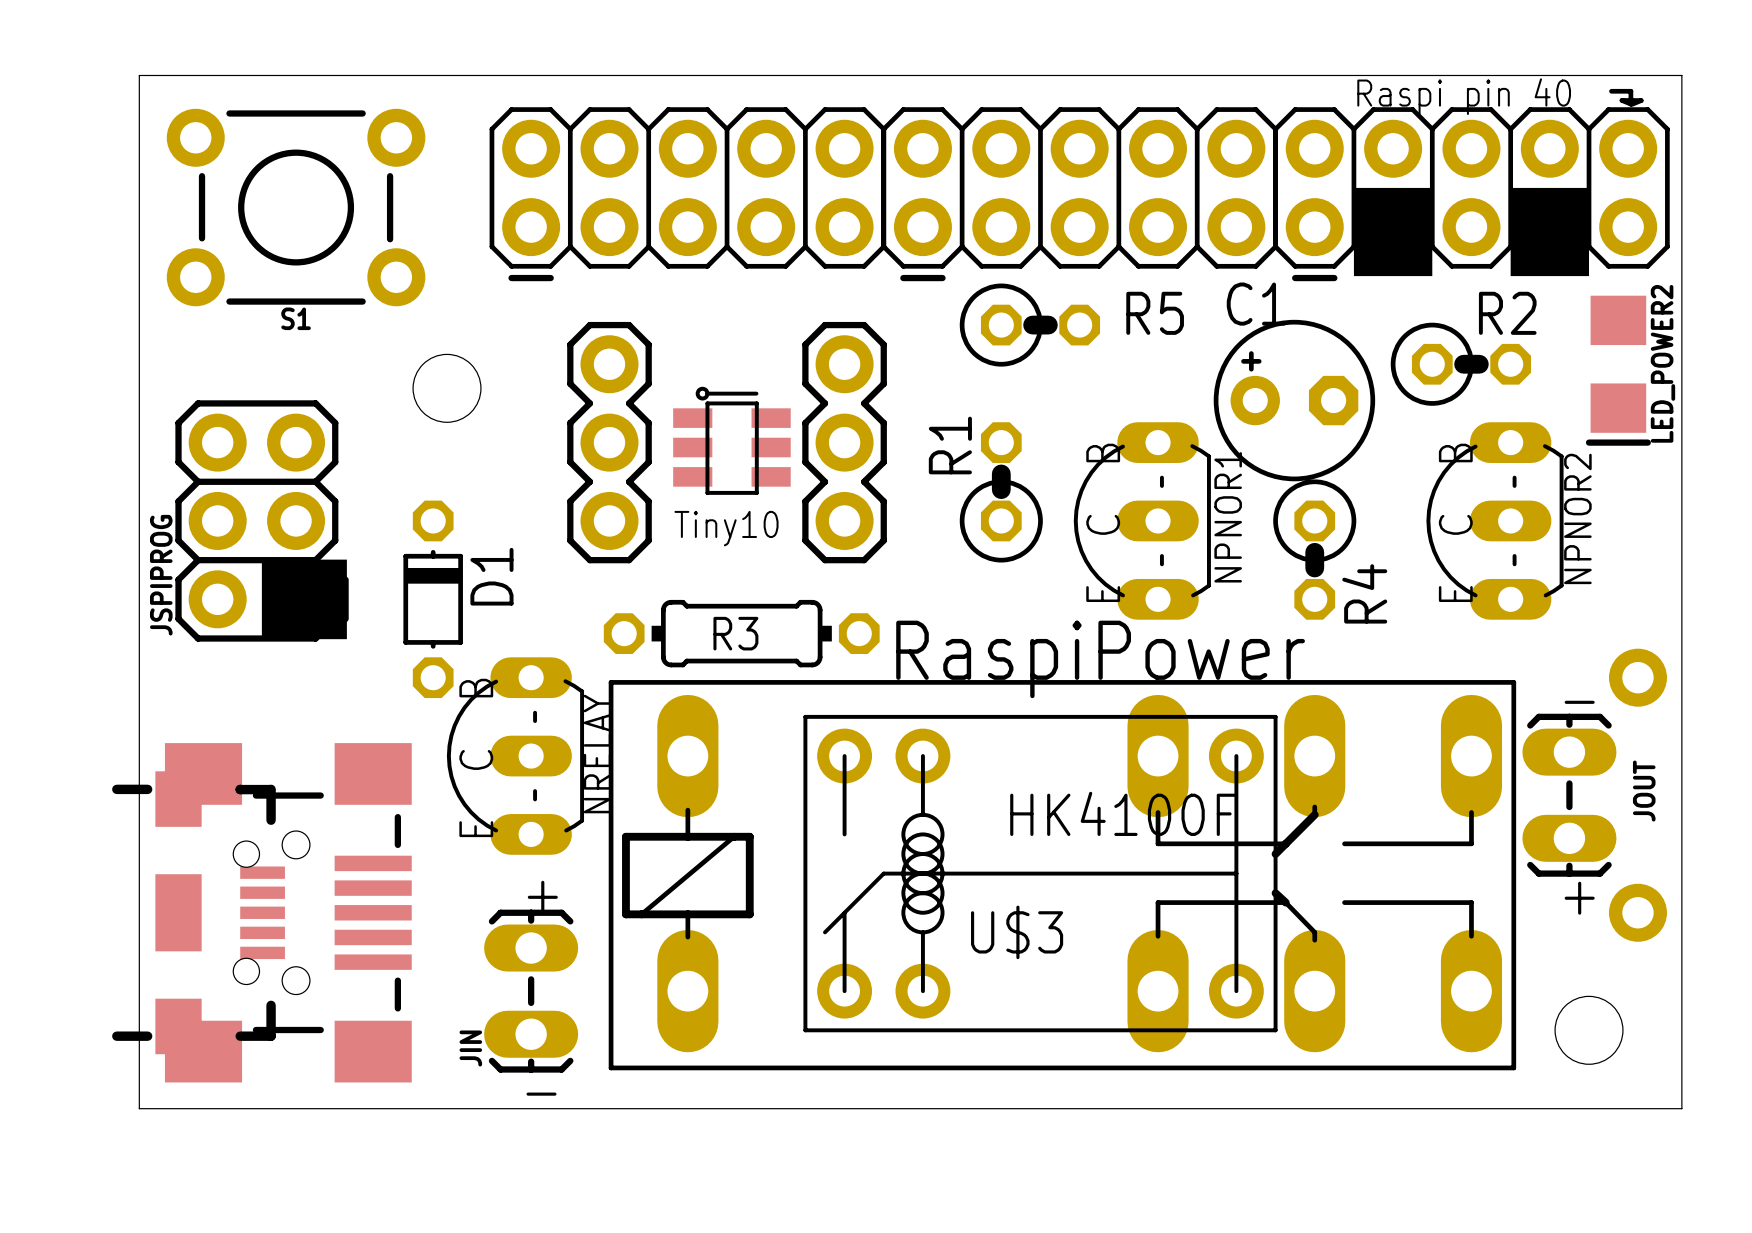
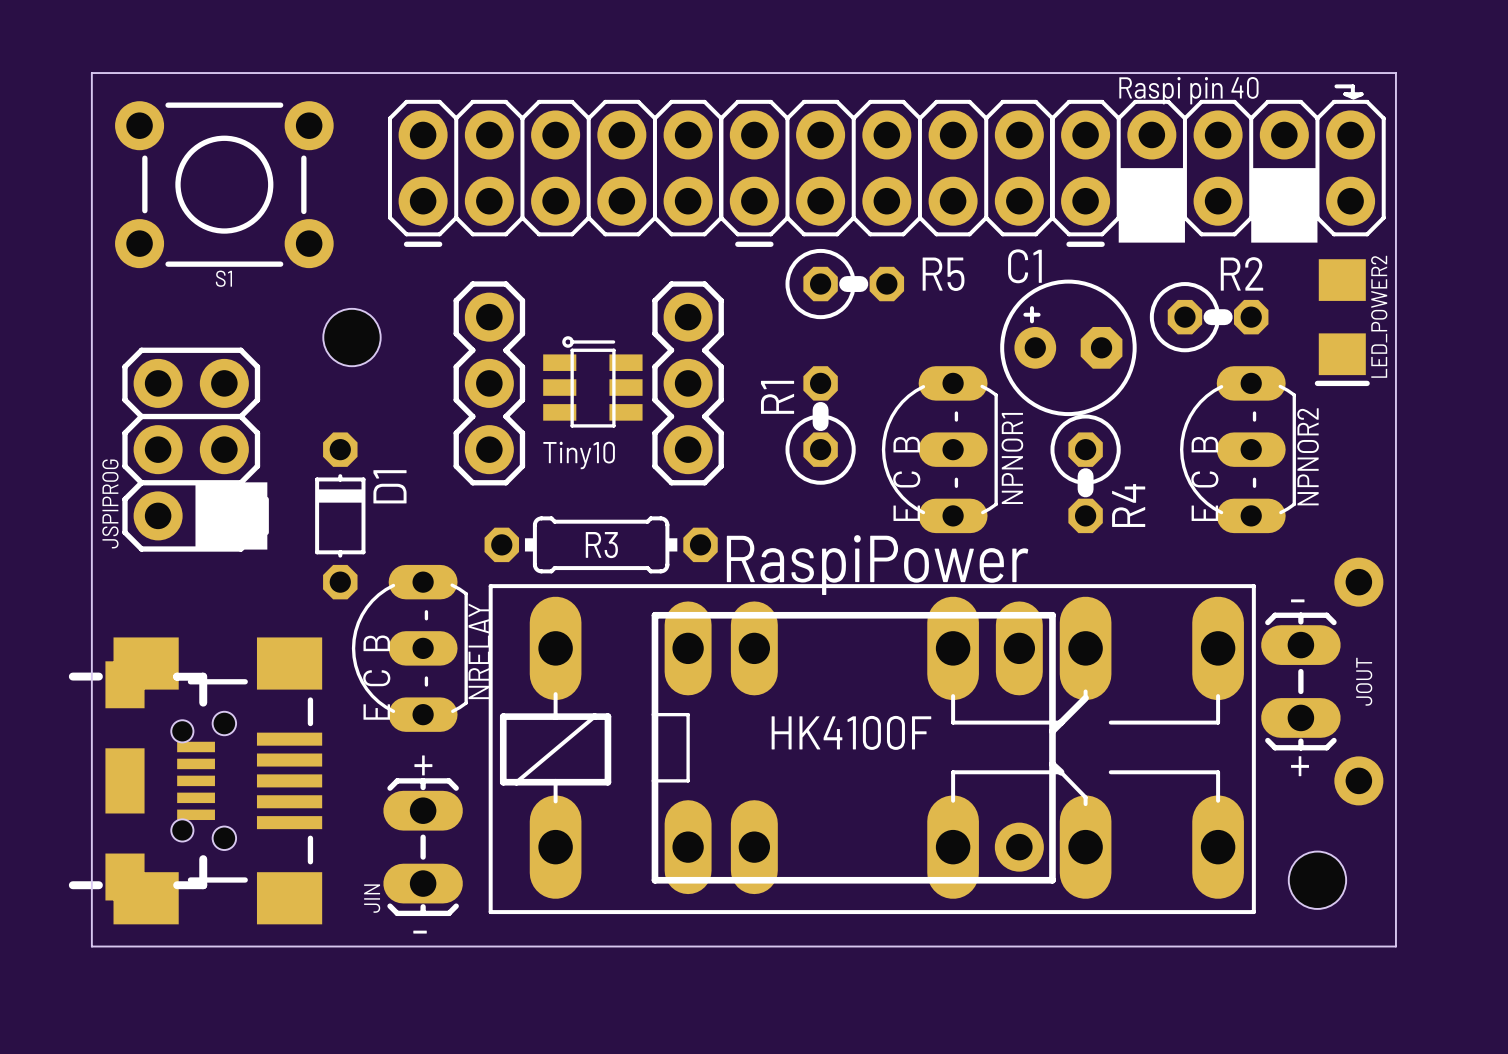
text: none -> HK4100F (851, 732)
U$3: (1040, 873) -> none
part: none -> (853, 747)
part: none -> (1019, 847)

